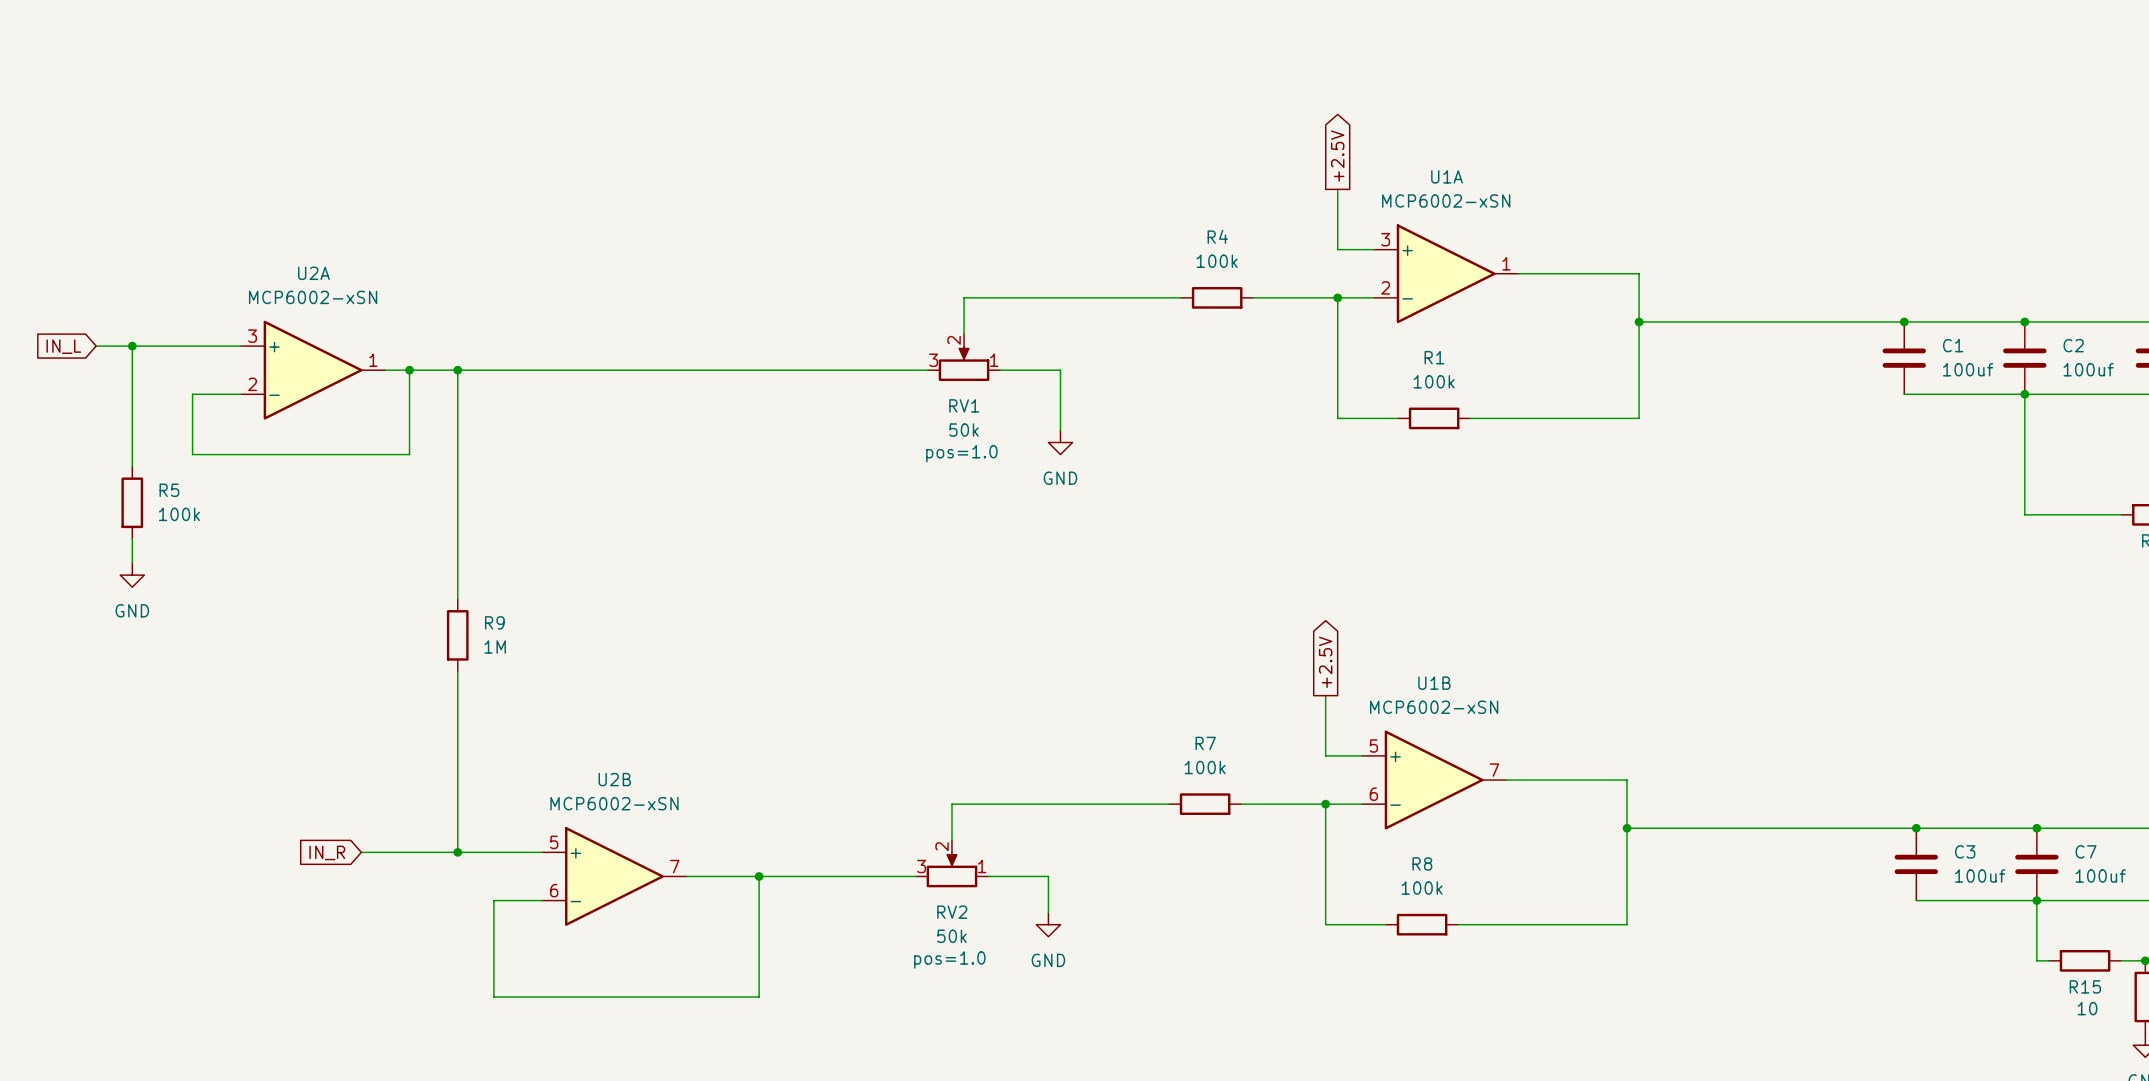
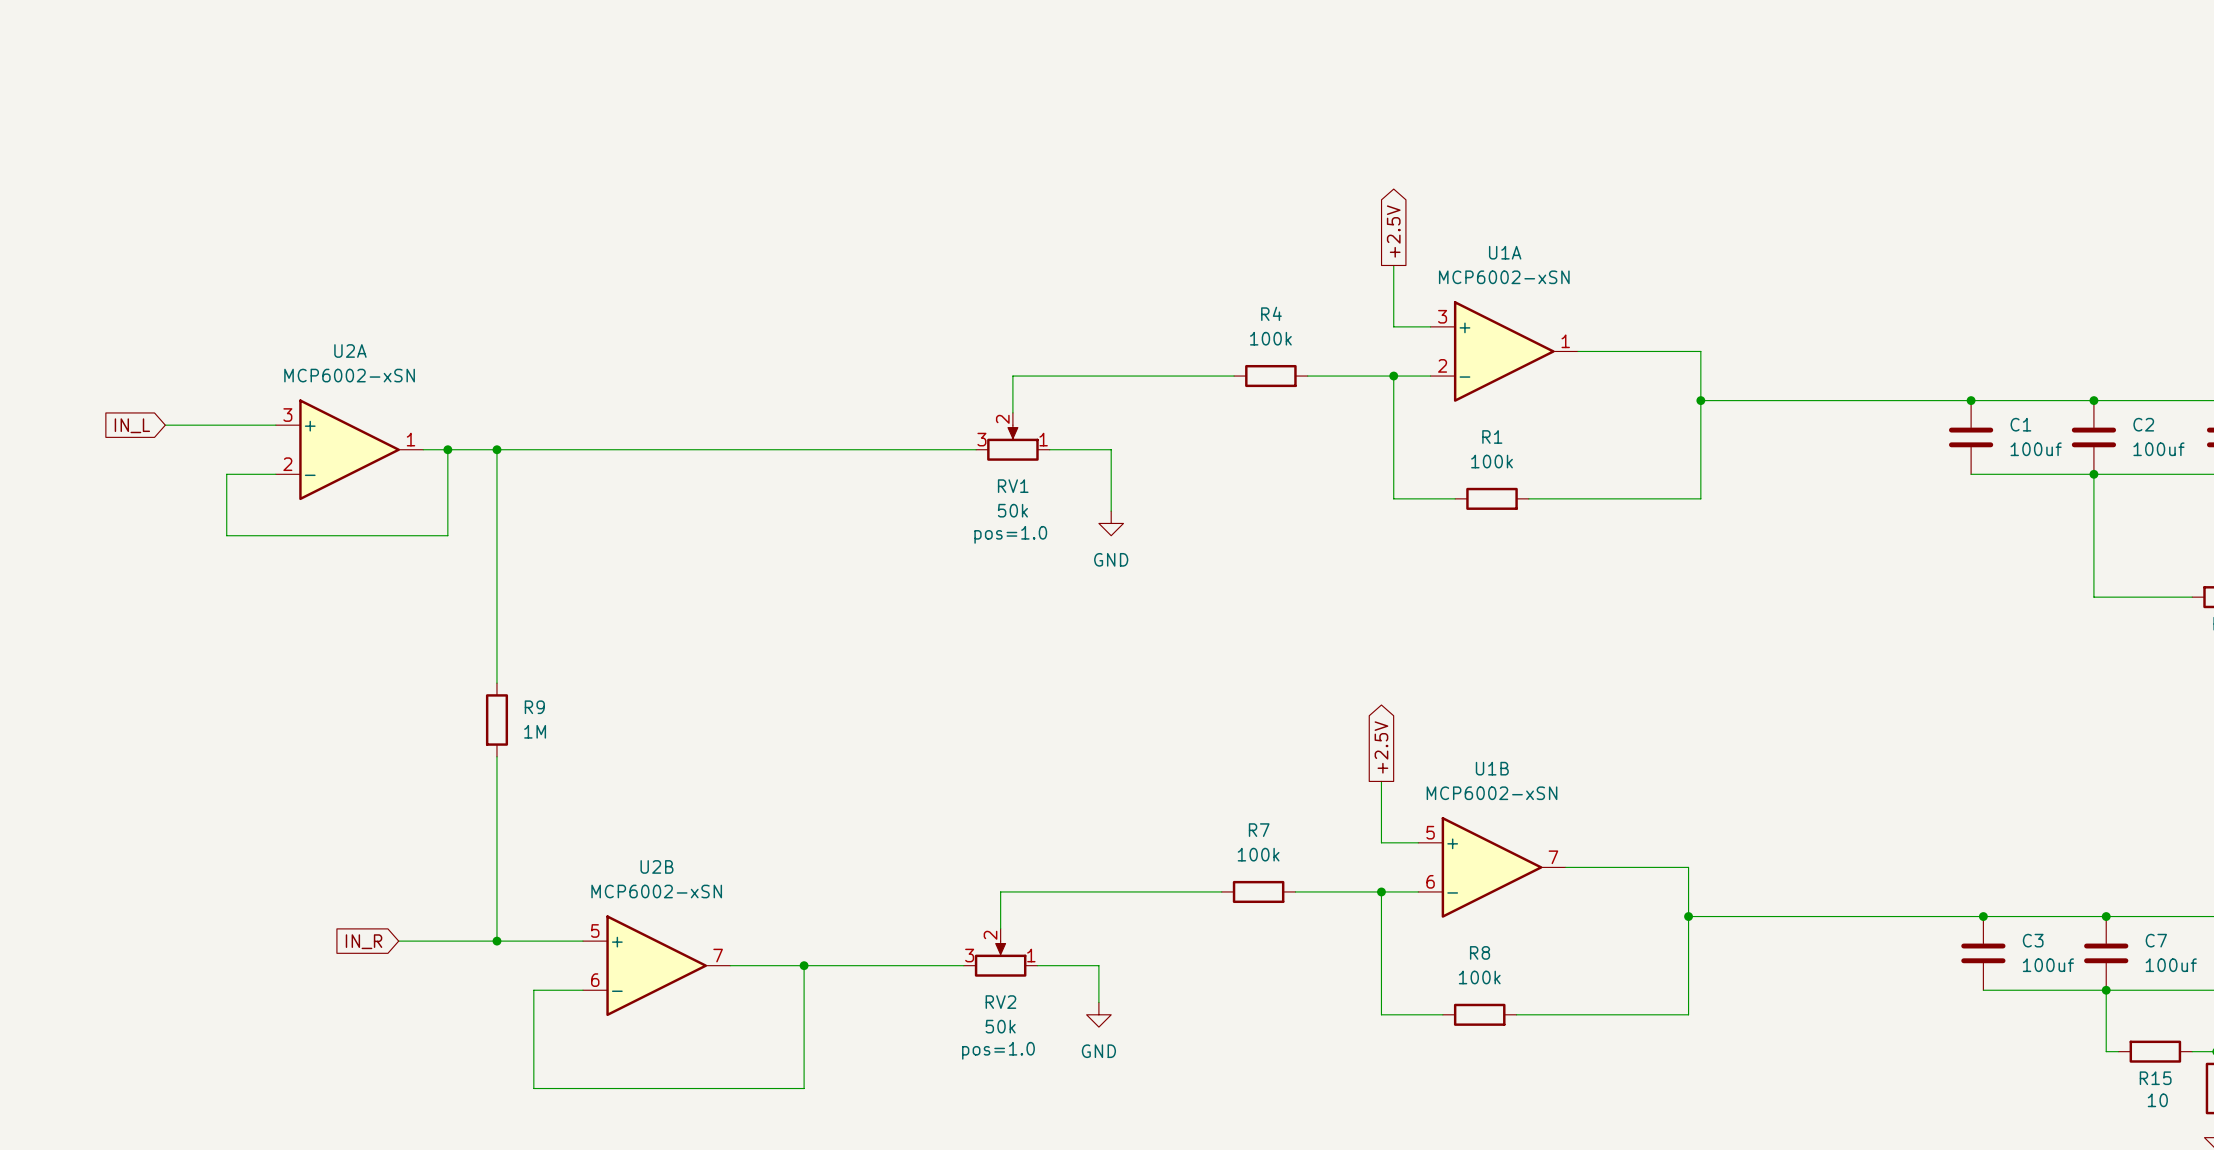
global label position: IN_L (63, 346) -> IN_L (132, 425)
wire: (96, 346) (132, 346) (132, 466) -> none
junction: (132, 346) -> none
R5: 100k (132, 502) -> none
wire: (132, 538) (132, 563) -> none
power symbol: GND (132, 575) -> none

